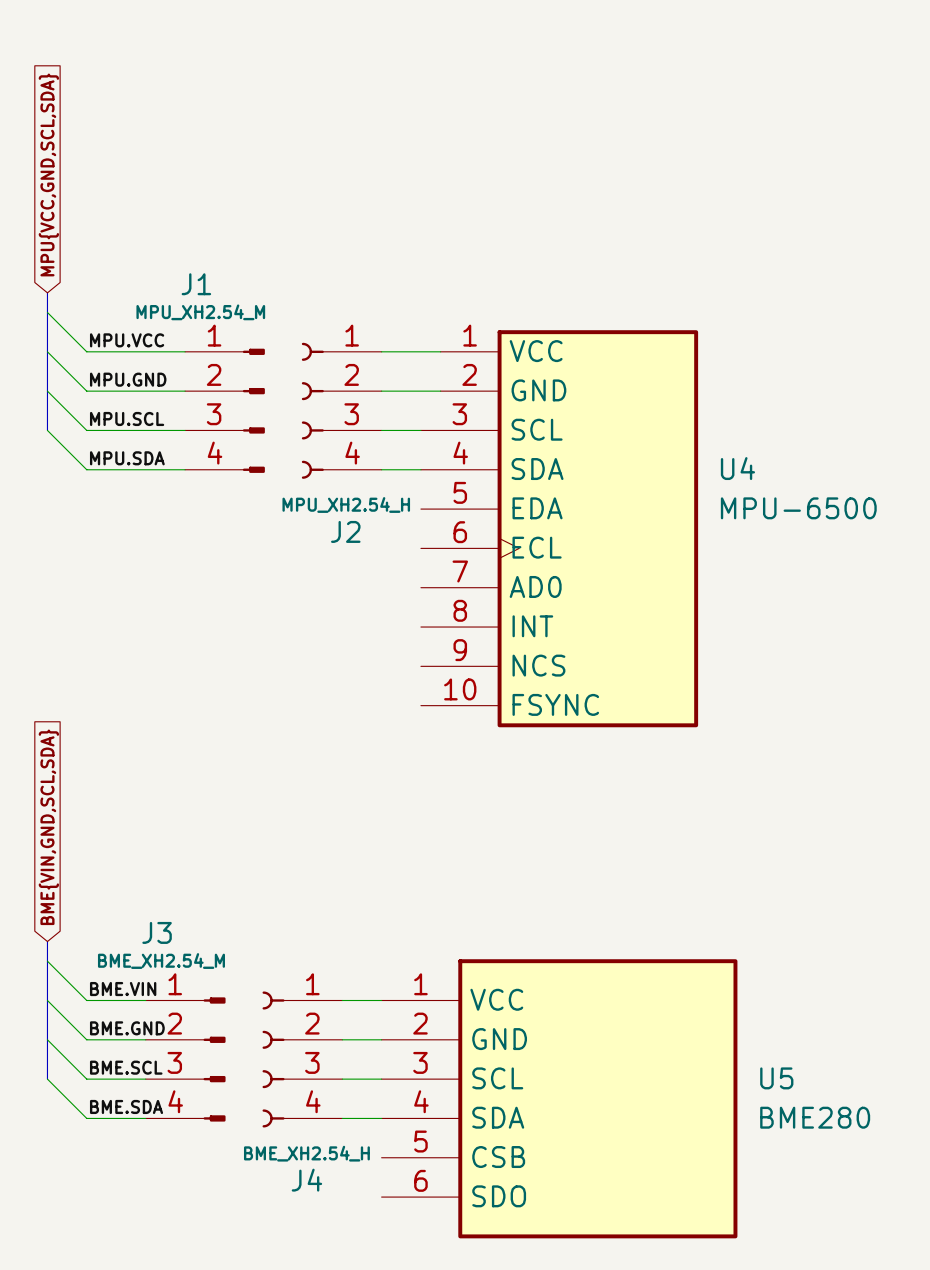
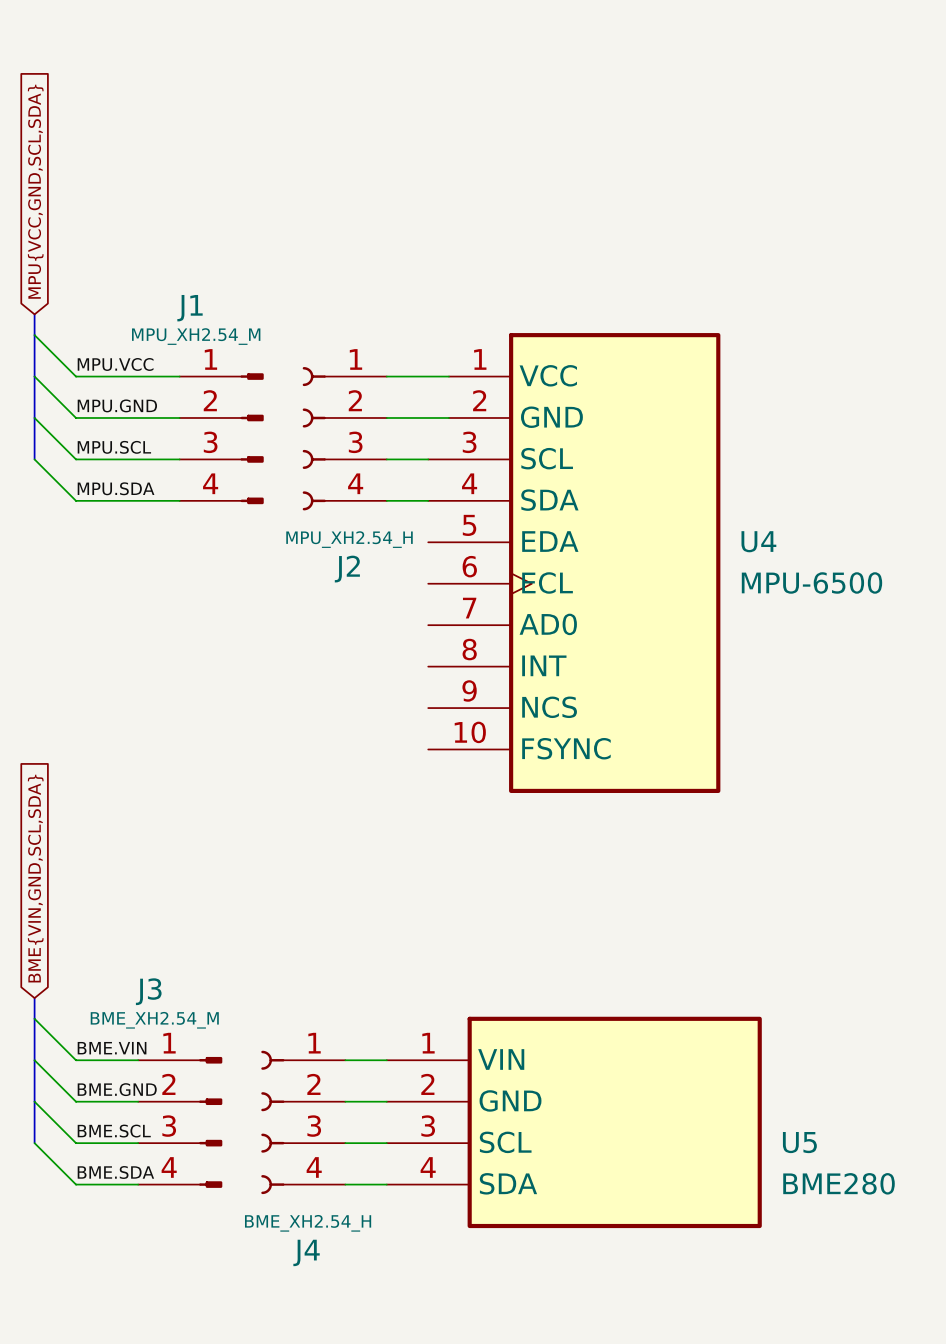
U4 symbol: [420, 330, 699, 728] -> [428, 333, 721, 793]
U4 name position: U4 (737, 468) -> U4 (758, 541)
U4 value position: MPU-6500 (798, 508) -> MPU-6500 (811, 582)
U5 symbol: [381, 959, 738, 1239] -> [386, 1016, 762, 1229]

